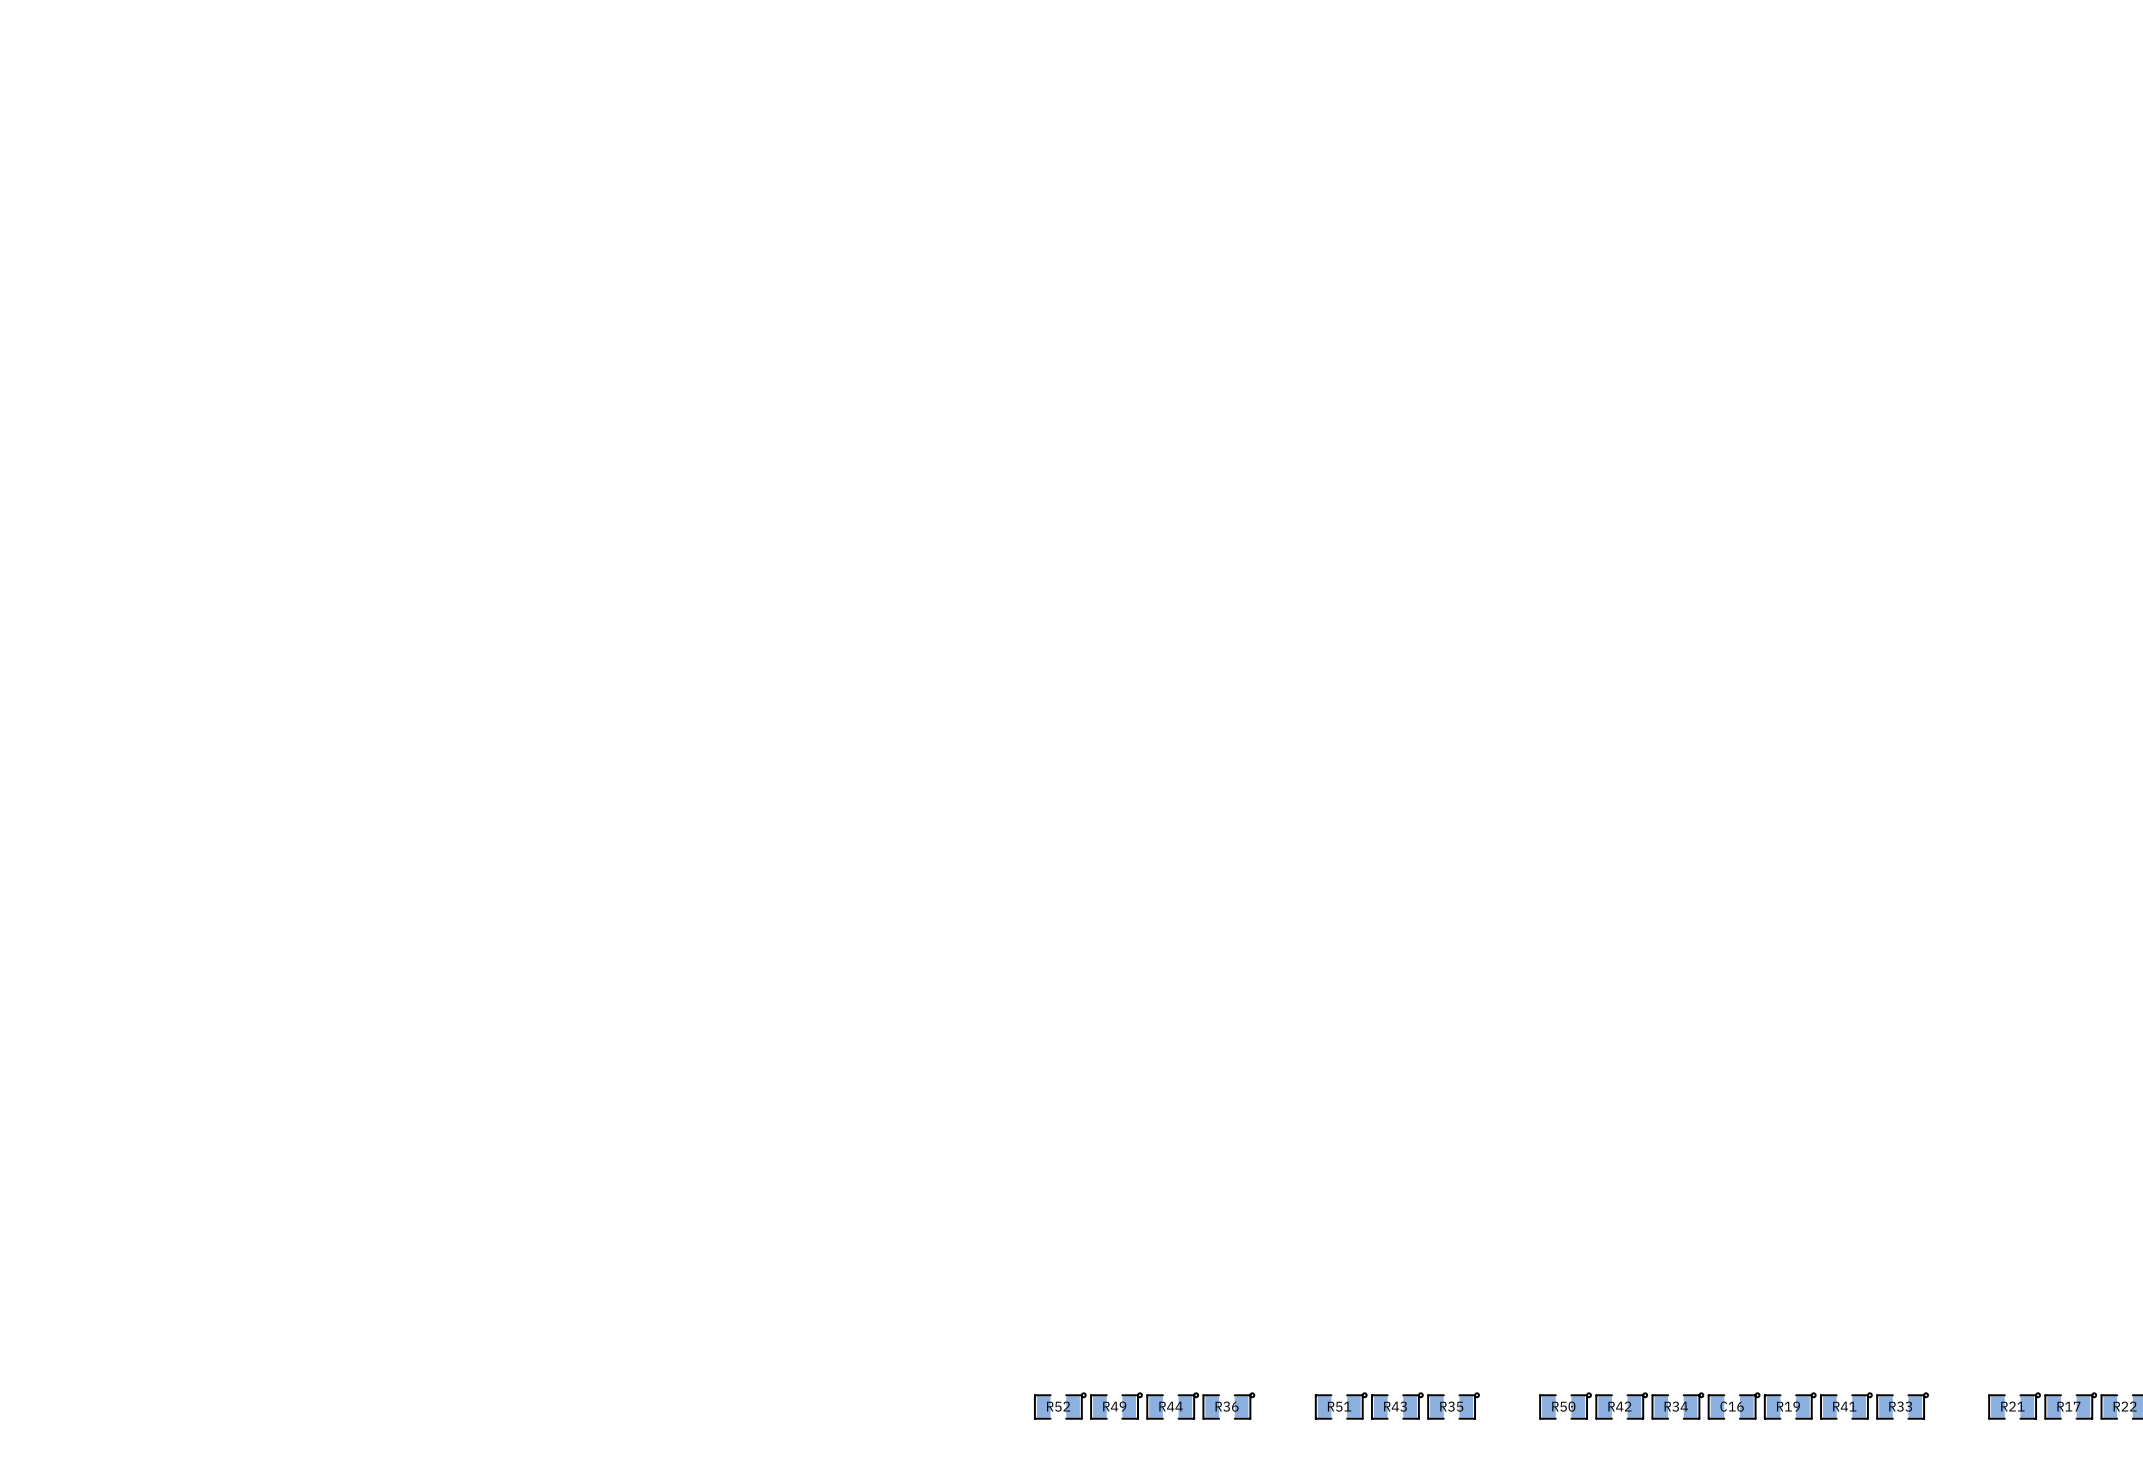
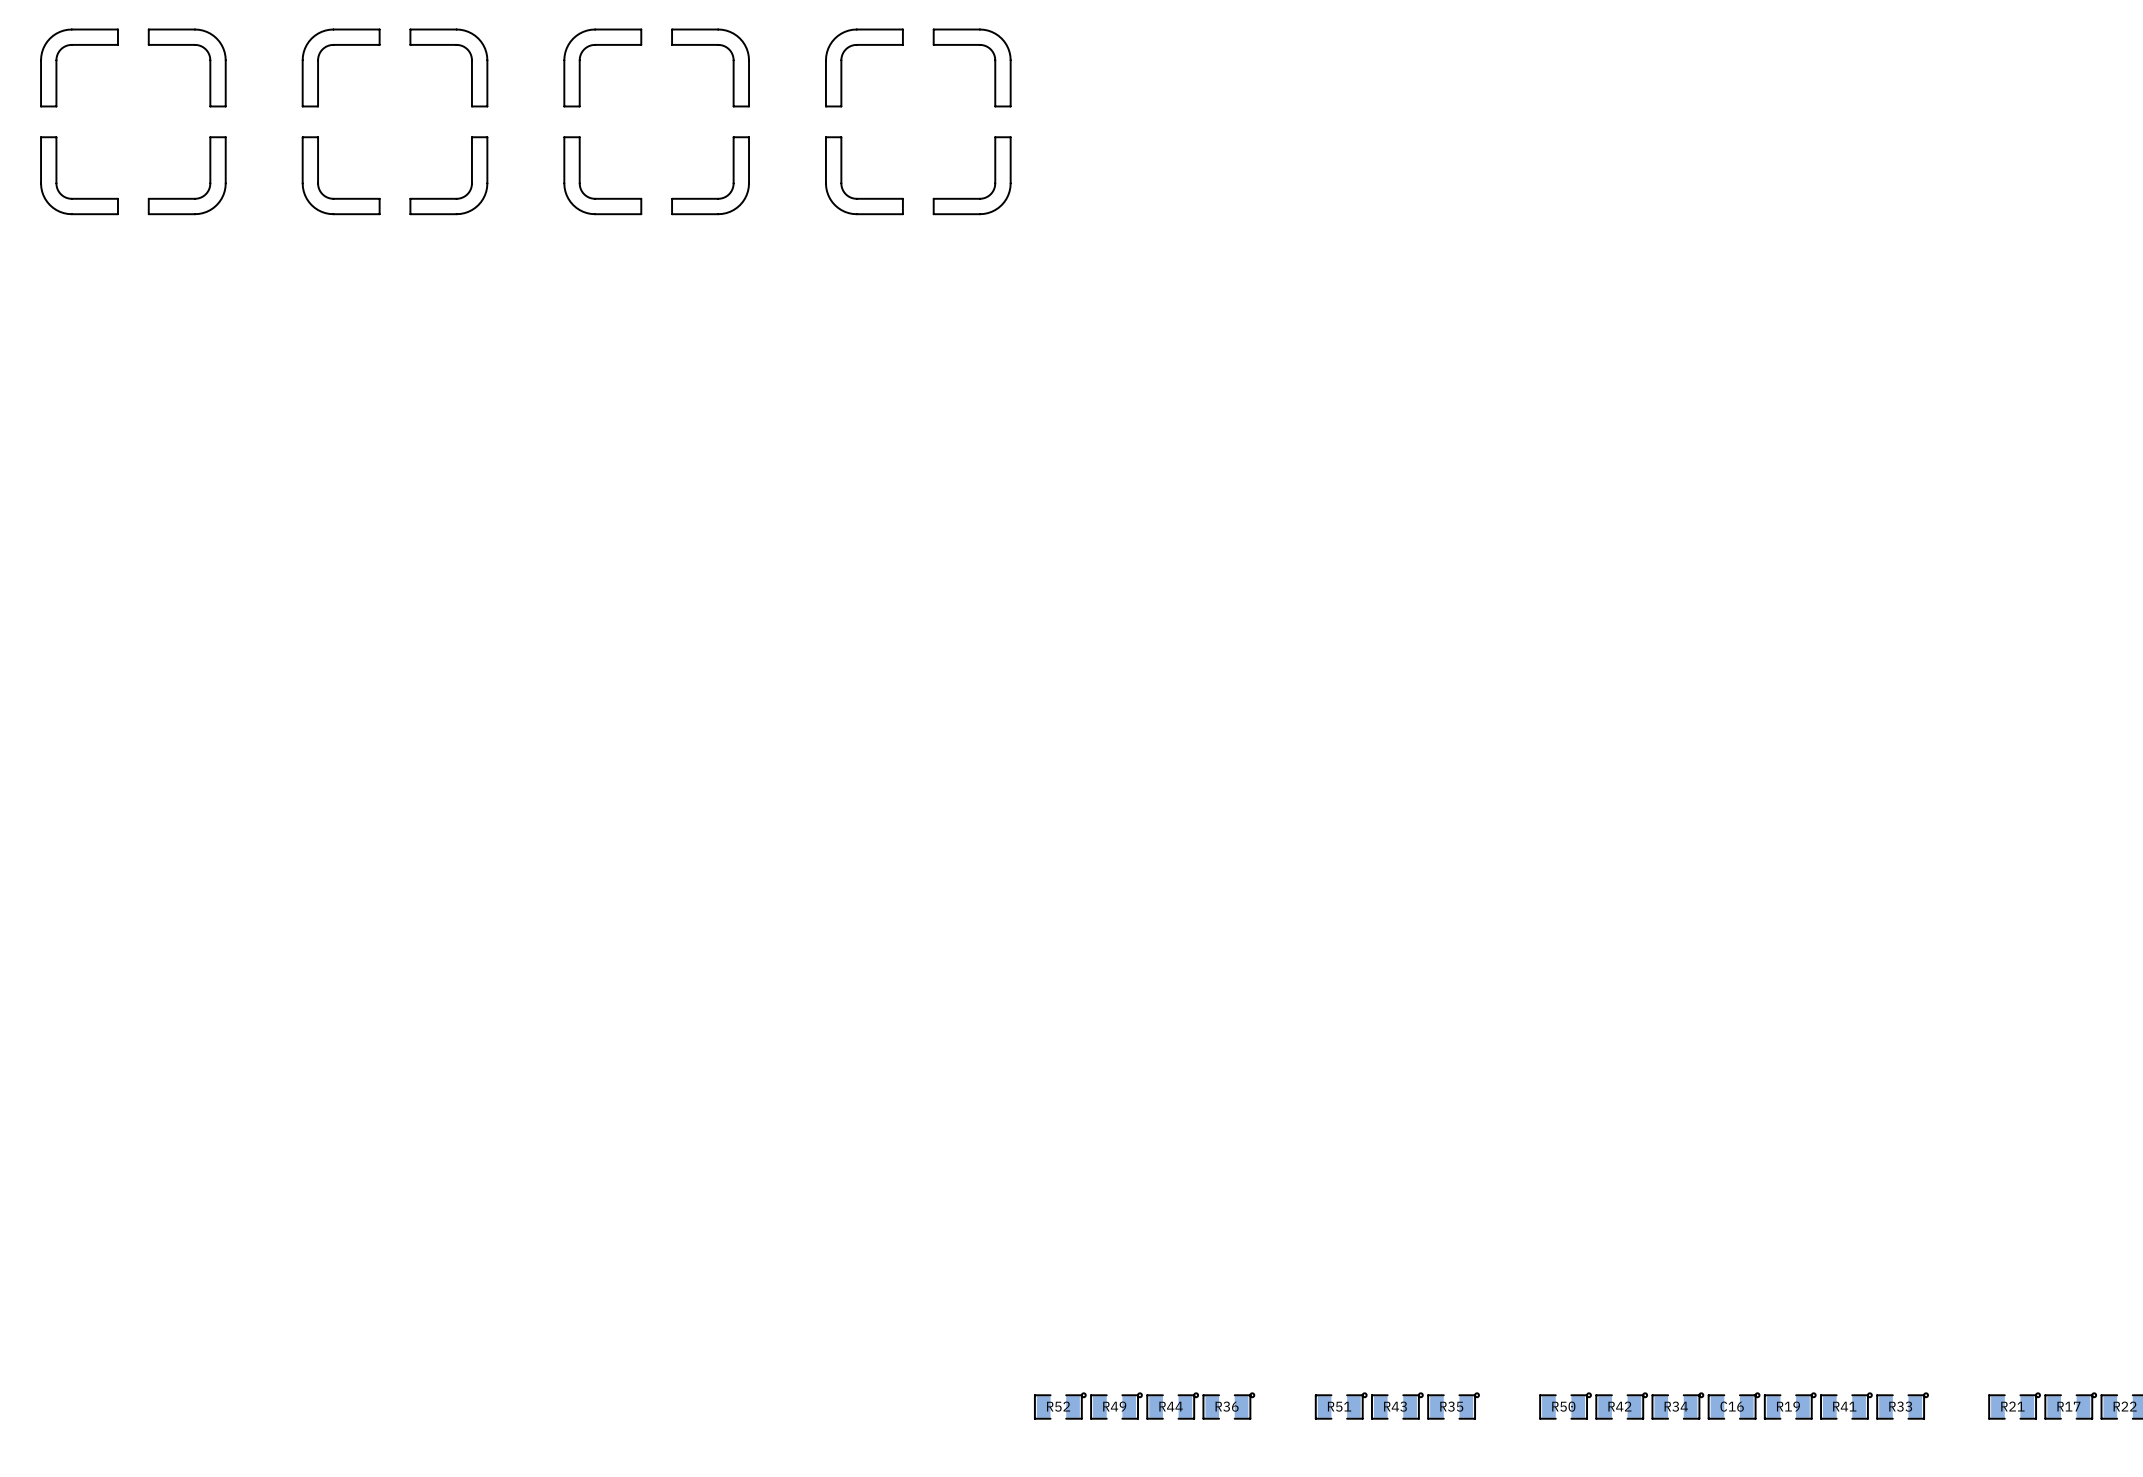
board edge: none -> (117, 29) (67, 29) (60, 31) (50, 38) (45, 44) (41, 56) (41, 106) (56, 106) (56, 58) (60, 49) (69, 45) (117, 44) (117, 29)
board edge: none -> (194, 29) (148, 29) (148, 44) (194, 44) (204, 48) (210, 58) (210, 106) (225, 106) (225, 60) (223, 48) (213, 35) (206, 31) (194, 29)
board edge: none -> (379, 29) (329, 29) (321, 31) (311, 38) (306, 44) (302, 56) (302, 106) (318, 106) (318, 58) (322, 49) (331, 45) (379, 44) (379, 29)
board edge: none -> (456, 29) (410, 29) (410, 44) (456, 44) (465, 48) (471, 58) (471, 106) (487, 106) (487, 60) (485, 48) (475, 35) (468, 31) (456, 29)
board edge: none -> (641, 29) (641, 44) (593, 45) (584, 49) (579, 58) (579, 106) (564, 106) (564, 56) (568, 44) (573, 38) (583, 31) (591, 29) (641, 29)
board edge: none -> (718, 29) (672, 29) (672, 44) (718, 44) (727, 48) (733, 58) (733, 106) (749, 106) (749, 60) (746, 48) (736, 35) (730, 31) (718, 29)
board edge: none -> (902, 29) (852, 29) (844, 31) (834, 38) (830, 44) (826, 56) (825, 106) (841, 106) (841, 58) (845, 49) (854, 45) (902, 44) (902, 29)
board edge: none -> (979, 29) (933, 29) (933, 44) (979, 44) (989, 48) (995, 58) (995, 106) (1010, 106) (1010, 60) (1008, 48) (998, 35) (991, 31) (979, 29)
board edge: none -> (56, 137) (41, 137) (41, 187) (47, 202) (56, 210) (67, 213) (117, 214) (117, 198) (69, 198) (59, 192) (56, 183) (56, 137)
board edge: none -> (225, 137) (210, 137) (210, 185) (205, 194) (196, 198) (148, 198) (148, 214) (198, 213) (206, 211) (216, 205) (221, 198) (225, 187) (225, 137)
board edge: none -> (318, 137) (302, 137) (302, 187) (309, 202) (318, 210) (329, 213) (379, 214) (379, 198) (331, 198) (321, 192) (318, 183) (318, 137)
board edge: none -> (487, 137) (471, 137) (471, 185) (467, 194) (458, 198) (410, 198) (410, 214) (460, 213) (468, 211) (478, 205) (483, 198) (487, 187) (487, 137)
board edge: none -> (579, 137) (564, 137) (564, 187) (570, 202) (579, 210) (591, 213) (641, 214) (641, 198) (593, 198) (582, 192) (579, 183) (579, 137)
board edge: none -> (749, 137) (733, 137) (733, 185) (729, 194) (720, 198) (672, 198) (672, 214) (722, 213) (730, 211) (740, 205) (744, 198) (748, 187) (749, 137)
board edge: none -> (841, 137) (825, 137) (826, 187) (832, 202) (841, 210) (852, 213) (902, 214) (902, 198) (854, 198) (844, 192) (841, 183) (841, 137)
board edge: none -> (1010, 137) (995, 137) (995, 185) (990, 194) (981, 198) (933, 198) (933, 214) (983, 213) (991, 211) (1001, 205) (1006, 198) (1010, 187) (1010, 137)

